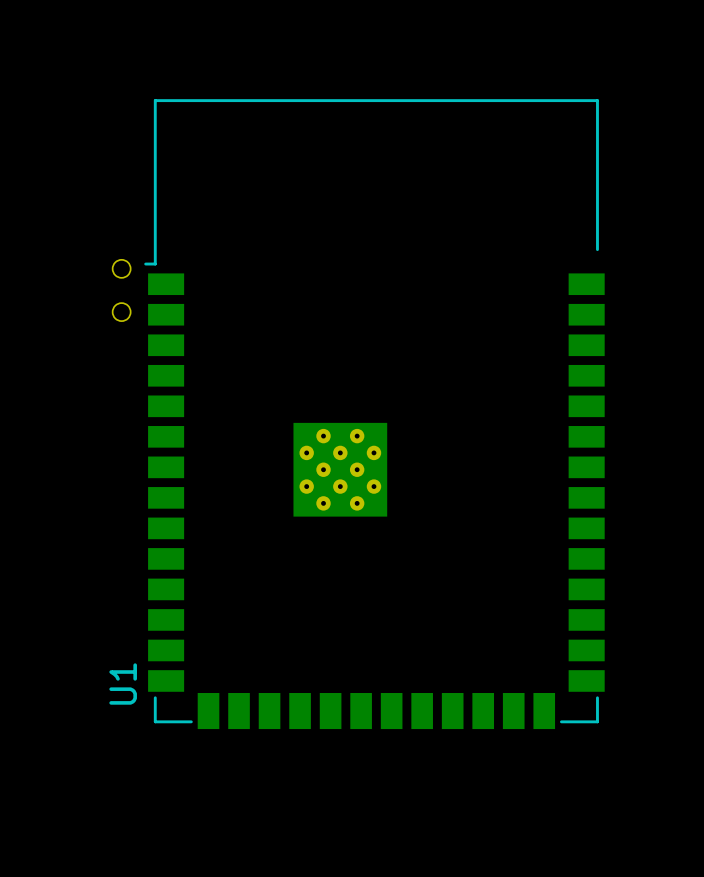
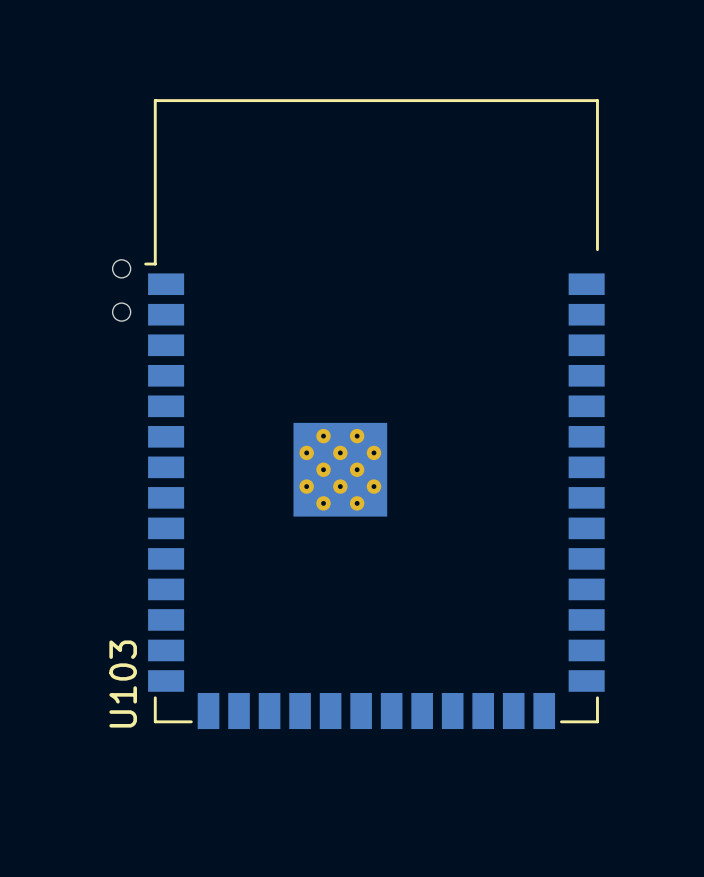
U1 name: U1 (123, 684) -> U103 (123, 684)

